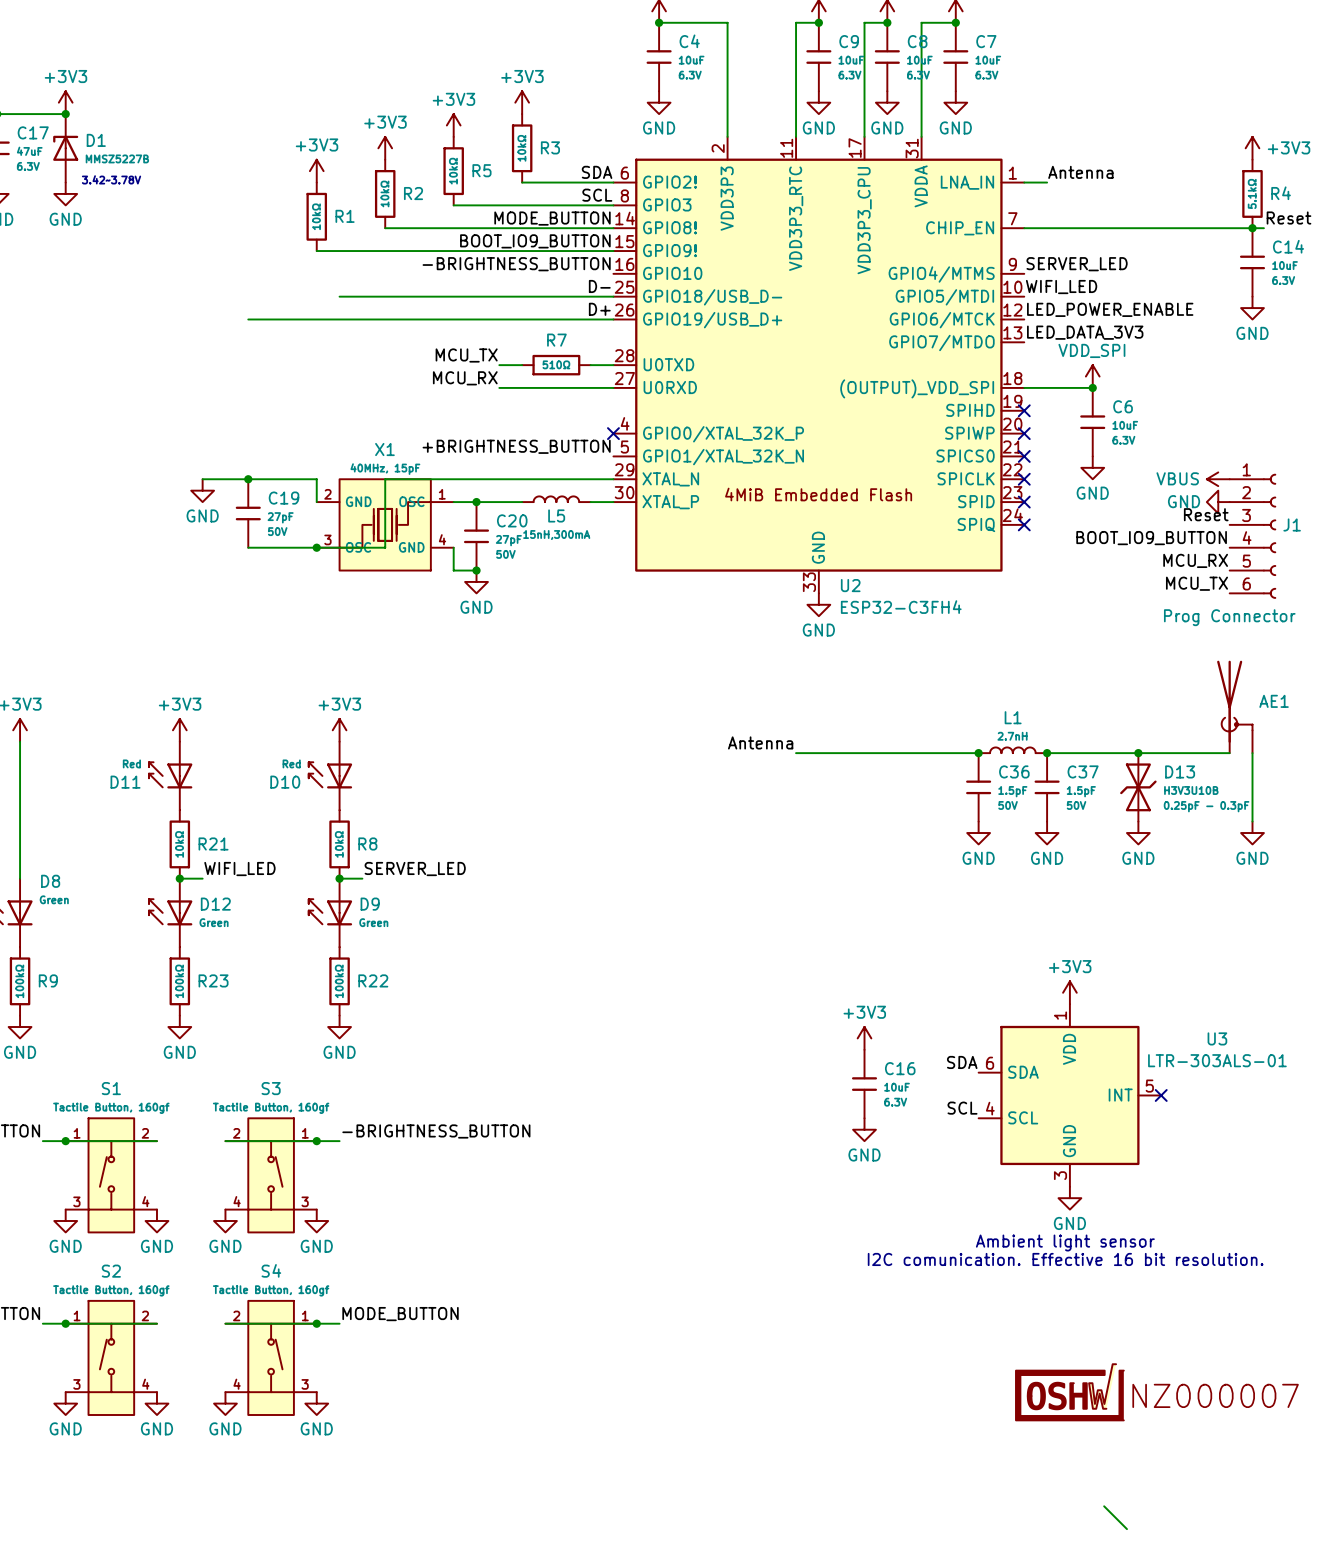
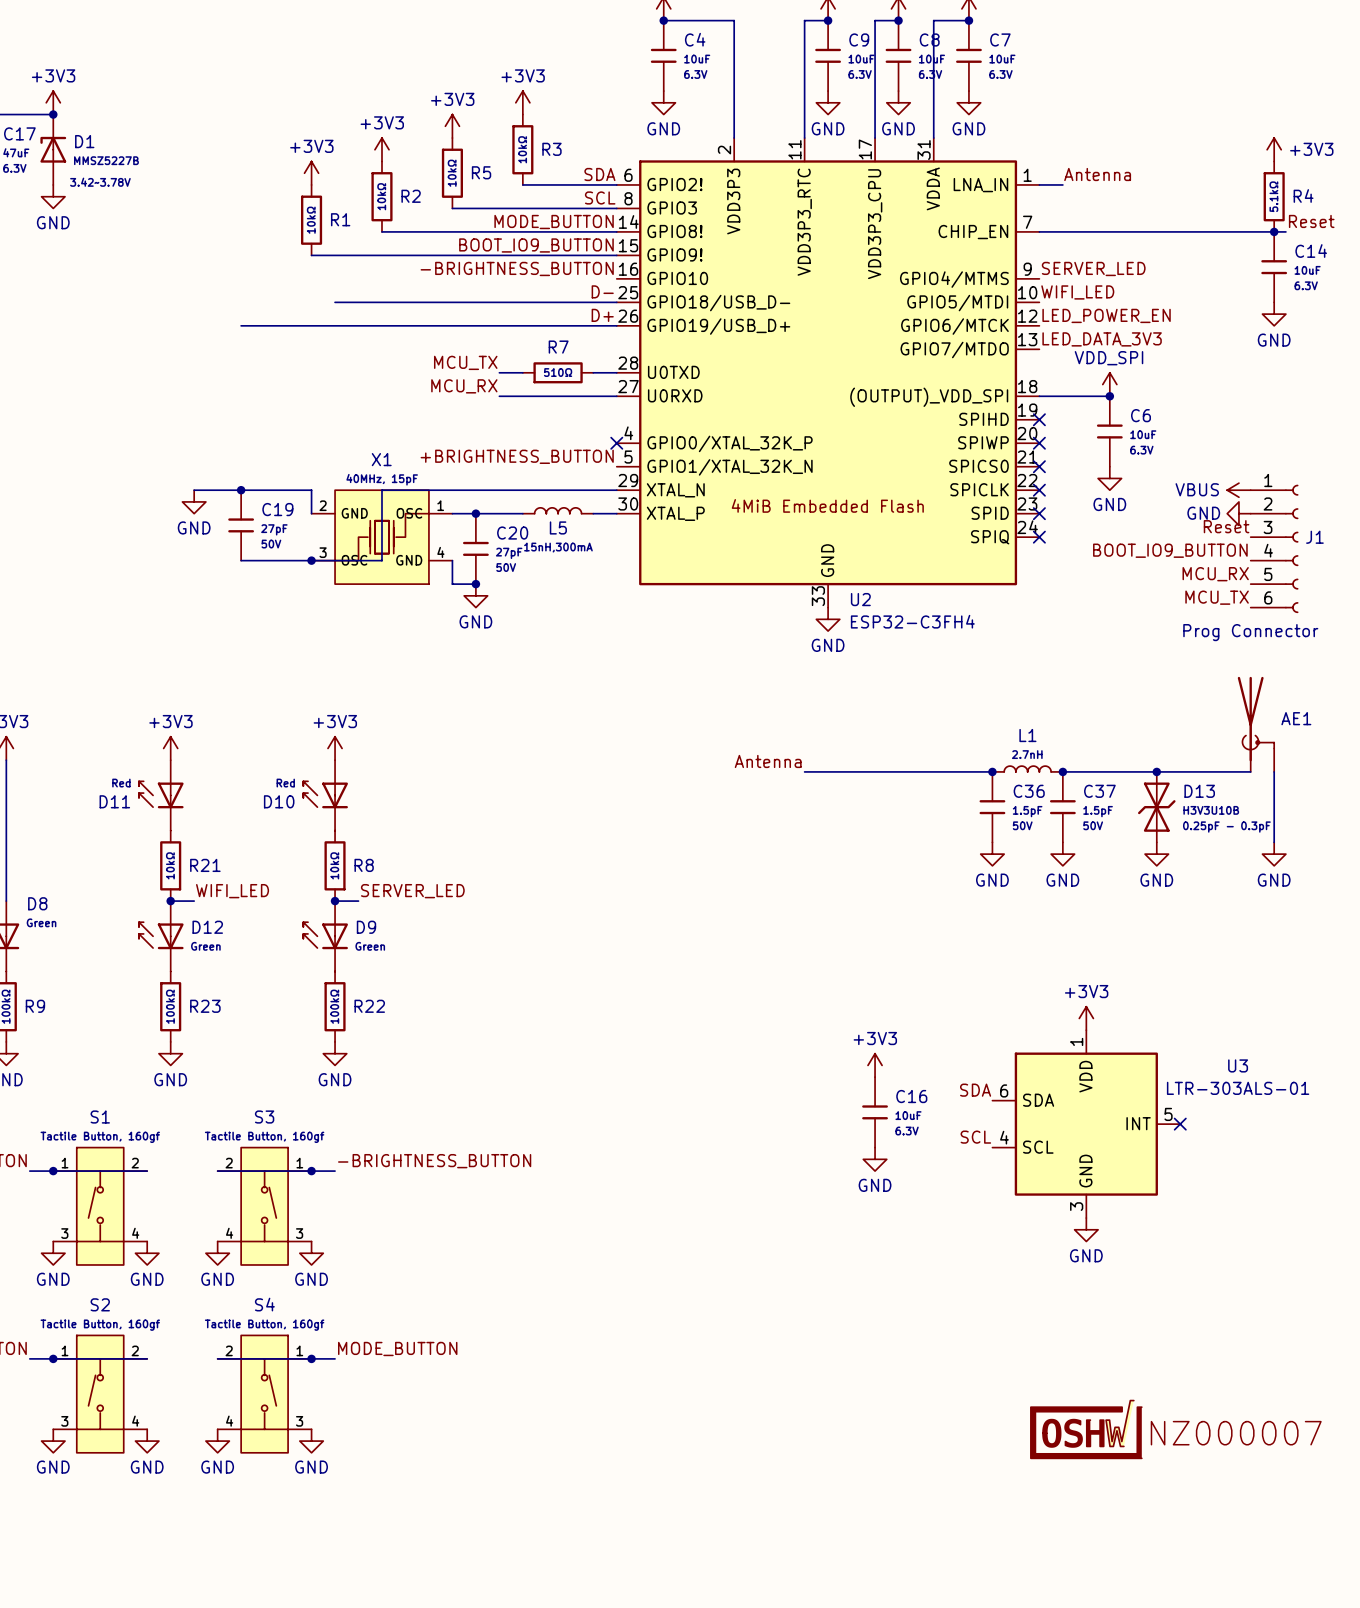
label: LED_POWER_ENABLE (1110, 309) -> LED_POWER_EN (1106, 315)
text: Ambient light sensor (1065, 1242) -> none
text: I2C comunication. Effective 16 bit resolution. (1065, 1259) -> none
wire: (1104, 1506) (1126, 1529) -> none

